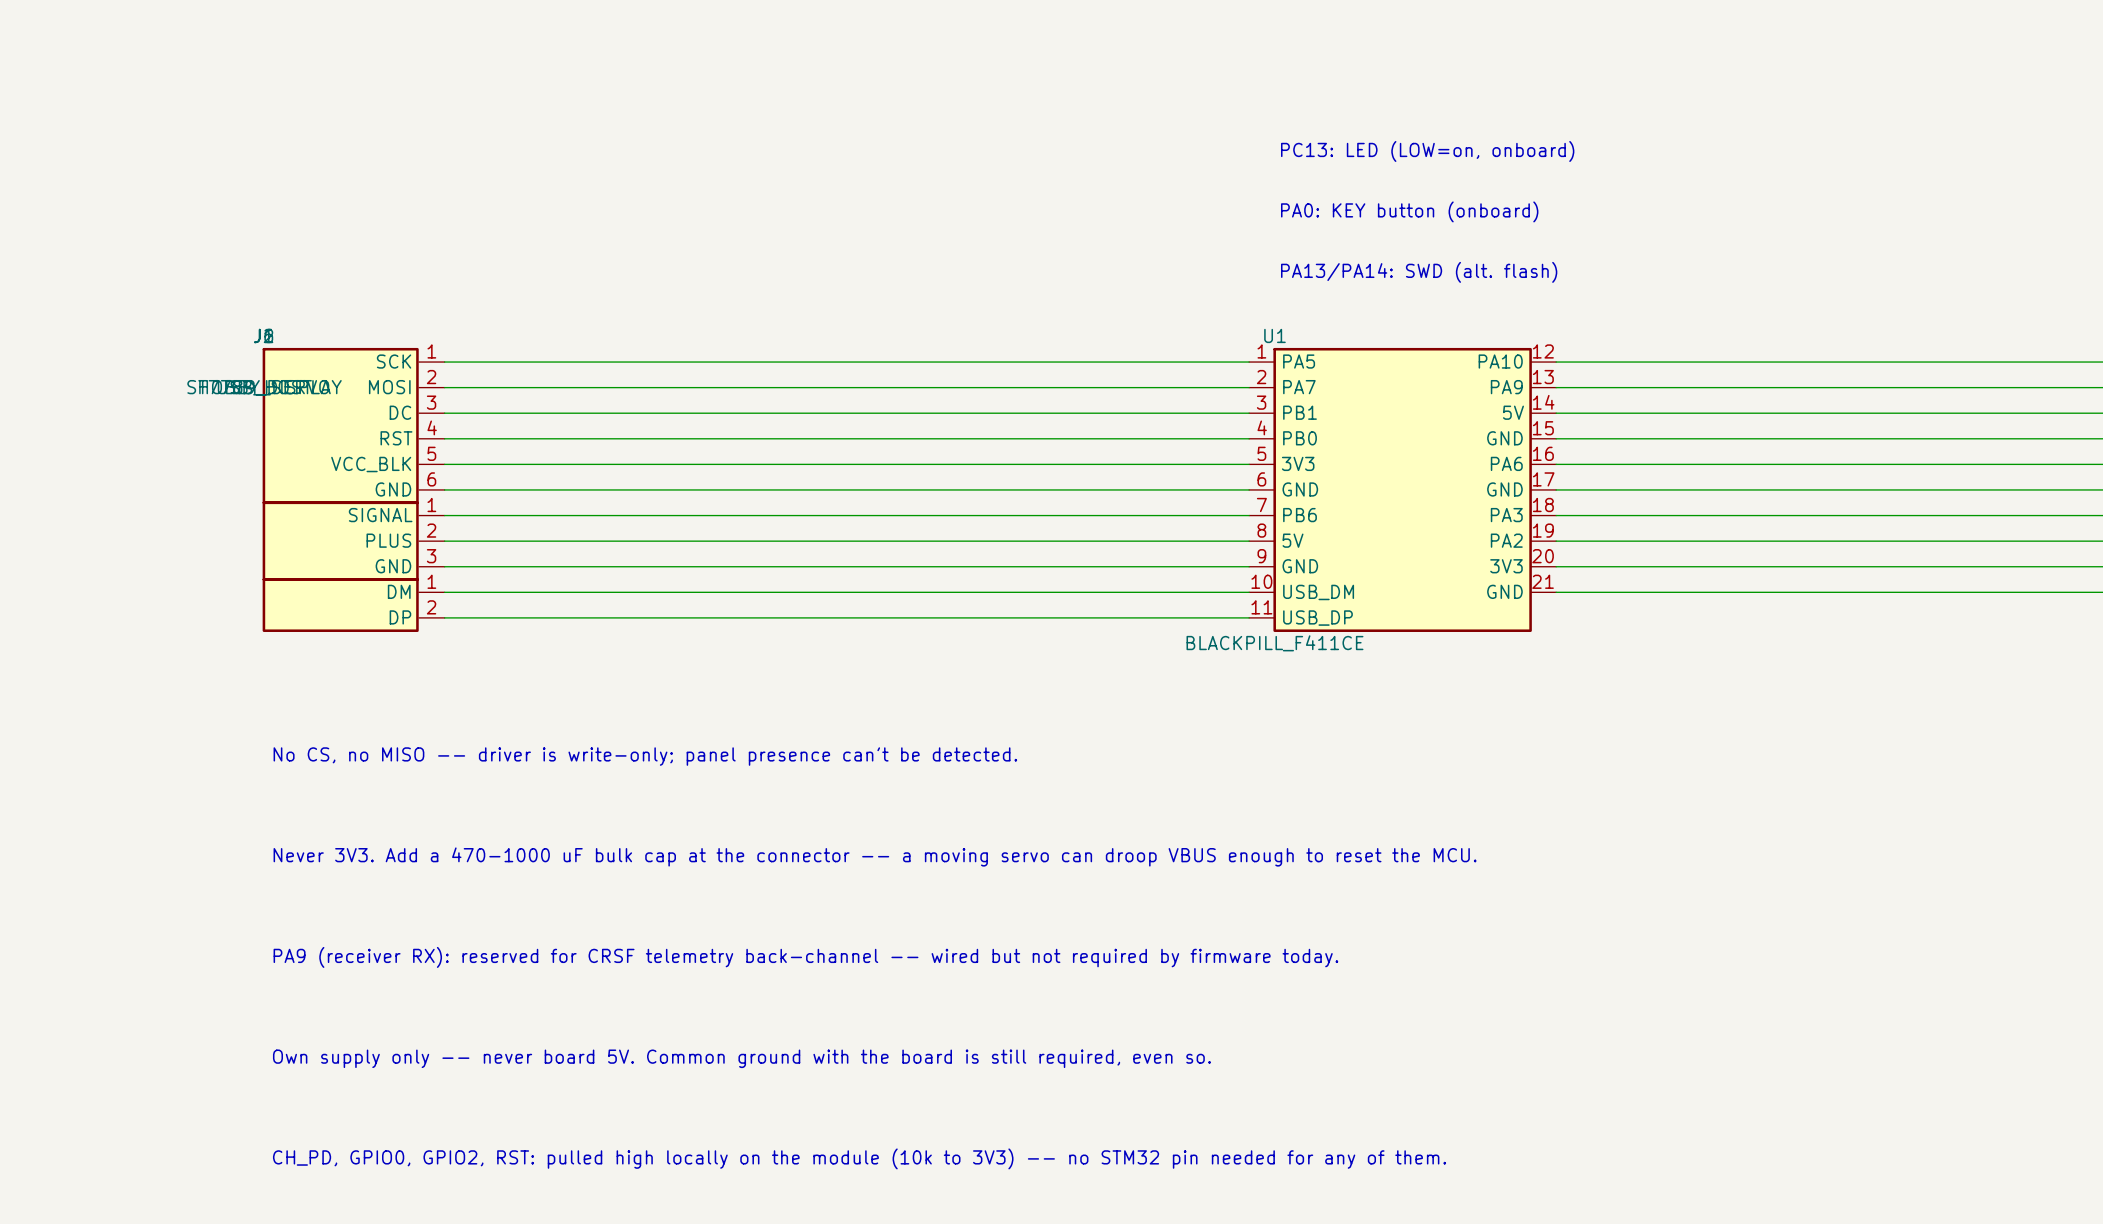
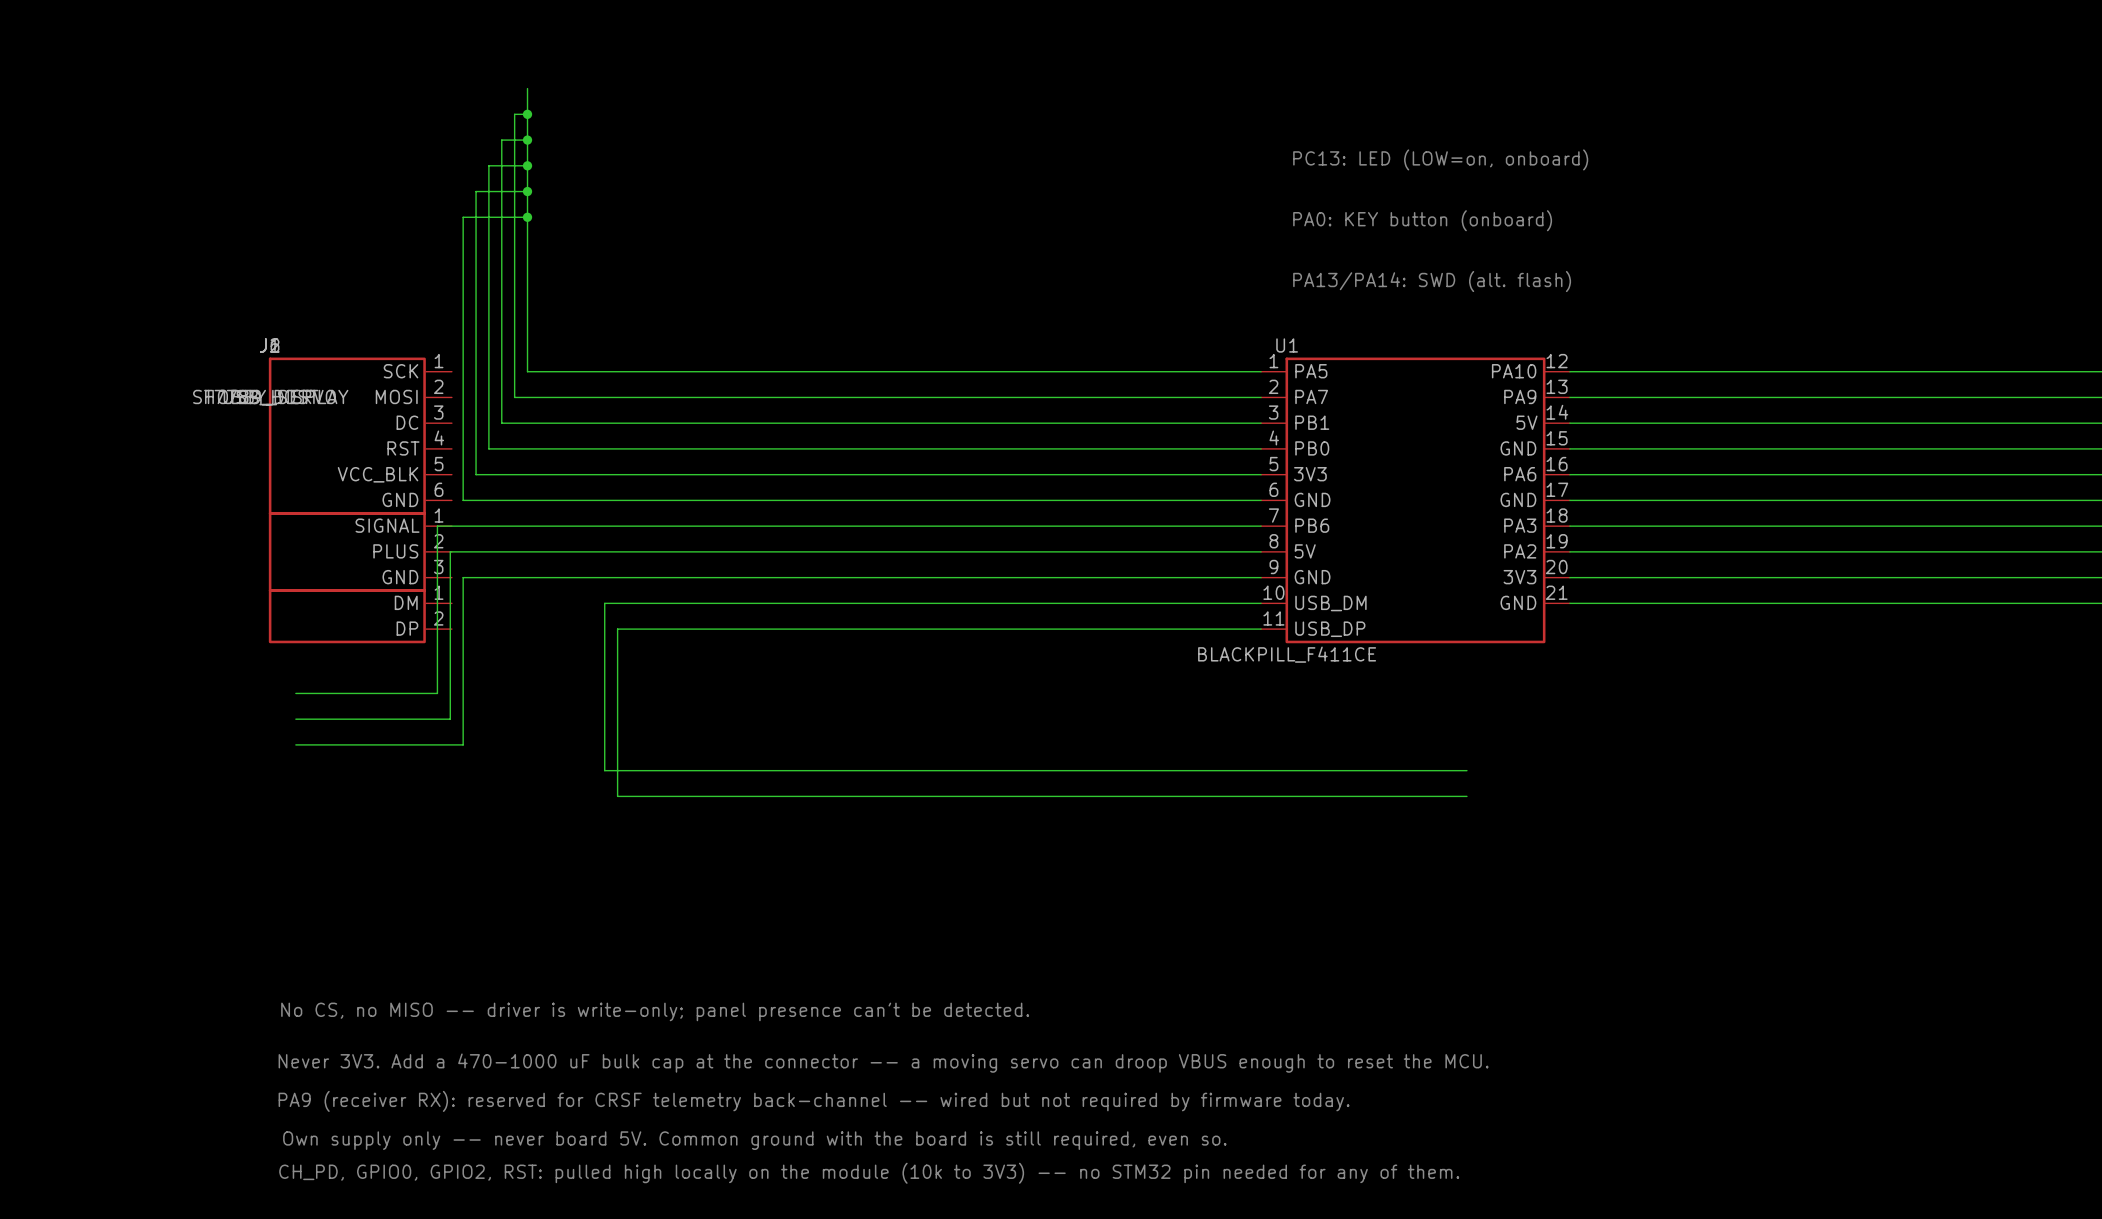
junction: none -> (527, 114)
junction: none -> (527, 140)
junction: none -> (527, 165)
junction: none -> (527, 191)
junction: none -> (527, 217)
wire: (444, 362) (519, 362) -> (527, 88) (527, 371)
wire: (444, 387) (507, 387) -> (527, 114) (514, 114) (514, 397)
wire: (444, 413) (494, 413) -> (527, 140) (501, 140) (501, 423)
wire: (444, 438) (481, 438) -> (527, 165) (488, 165) (488, 448)
wire: (444, 464) (468, 464) -> (527, 191) (476, 191) (476, 474)
wire: (444, 489) (455, 489) -> (527, 217) (463, 217) (463, 500)
wire: none -> (451, 526) (437, 526) (437, 693) (295, 693)
wire: none -> (451, 551) (450, 551) (450, 719) (295, 719)
wire: (444, 566) (455, 566) -> (295, 744) (463, 744) (463, 577)
wire: (444, 592) (596, 592) -> (1466, 770) (604, 770) (604, 603)
wire: (444, 617) (609, 617) -> (1466, 796) (617, 796) (617, 629)
text position: No CS, no MISO -- driver is write-only; panel presence can't be detected. (645, 756) -> No CS, no MISO -- driver is write-only; panel presence can't be detected. (655, 1011)
text position: Never 3V3. Add a 470-1000 uF bulk cap at the connector -- a moving servo can droop VBUS enough to reset the MCU. (875, 856) -> Never 3V3. Add a 470-1000 uF bulk cap at the connector -- a moving servo can droop VBUS enough to reset the MCU. (883, 1063)
text position: PA9 (receiver RX): reserved for CRSF telemetry back-channel -- wired but not required by firmware today. (805, 957) -> PA9 (receiver RX): reserved for CRSF telemetry back-channel -- wired but not required by firmware today. (814, 1101)
text position: Own supply only -- never board 5V. Common ground with the board is still required, even so. (741, 1058) -> Own supply only -- never board 5V. Common ground with the board is still required, even so. (754, 1140)

